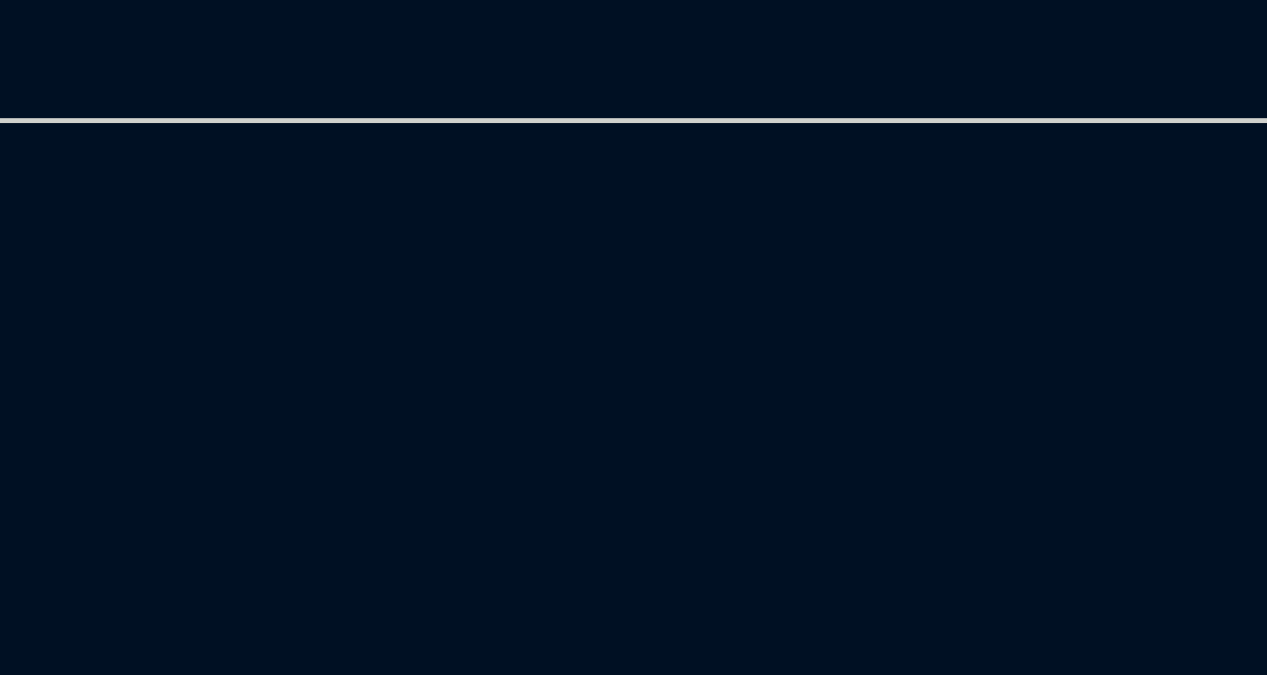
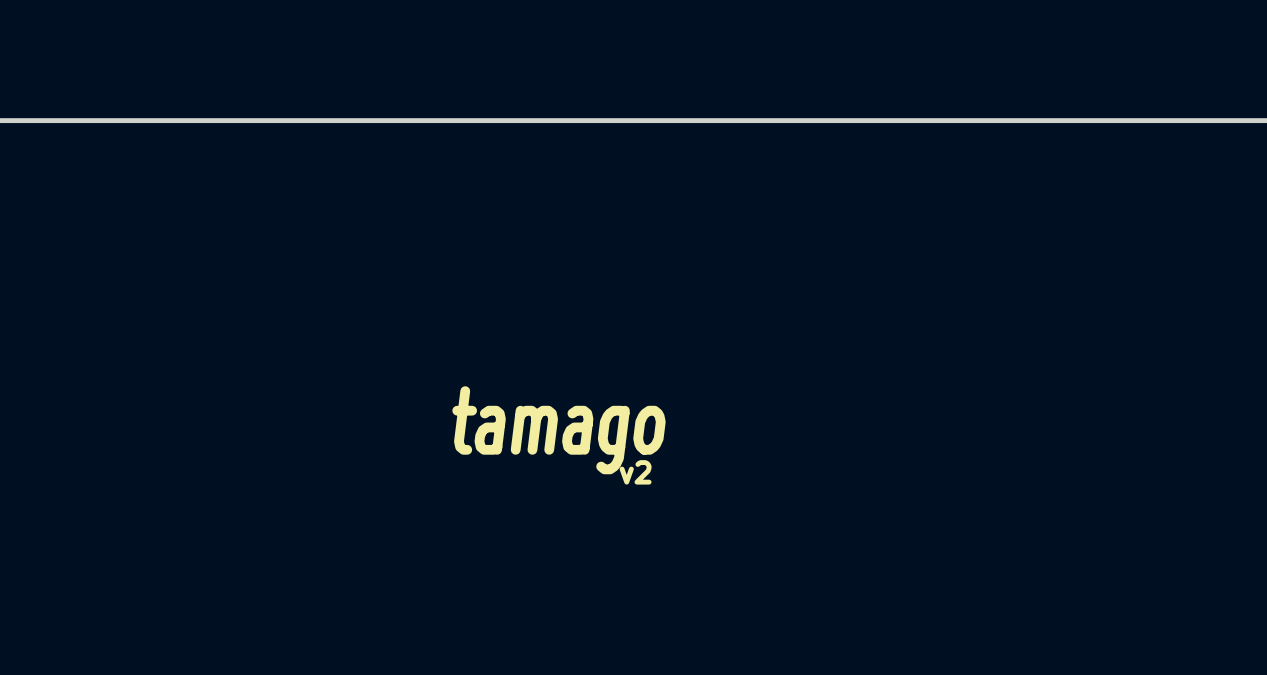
drawing: none -> [452, 386, 666, 485]

